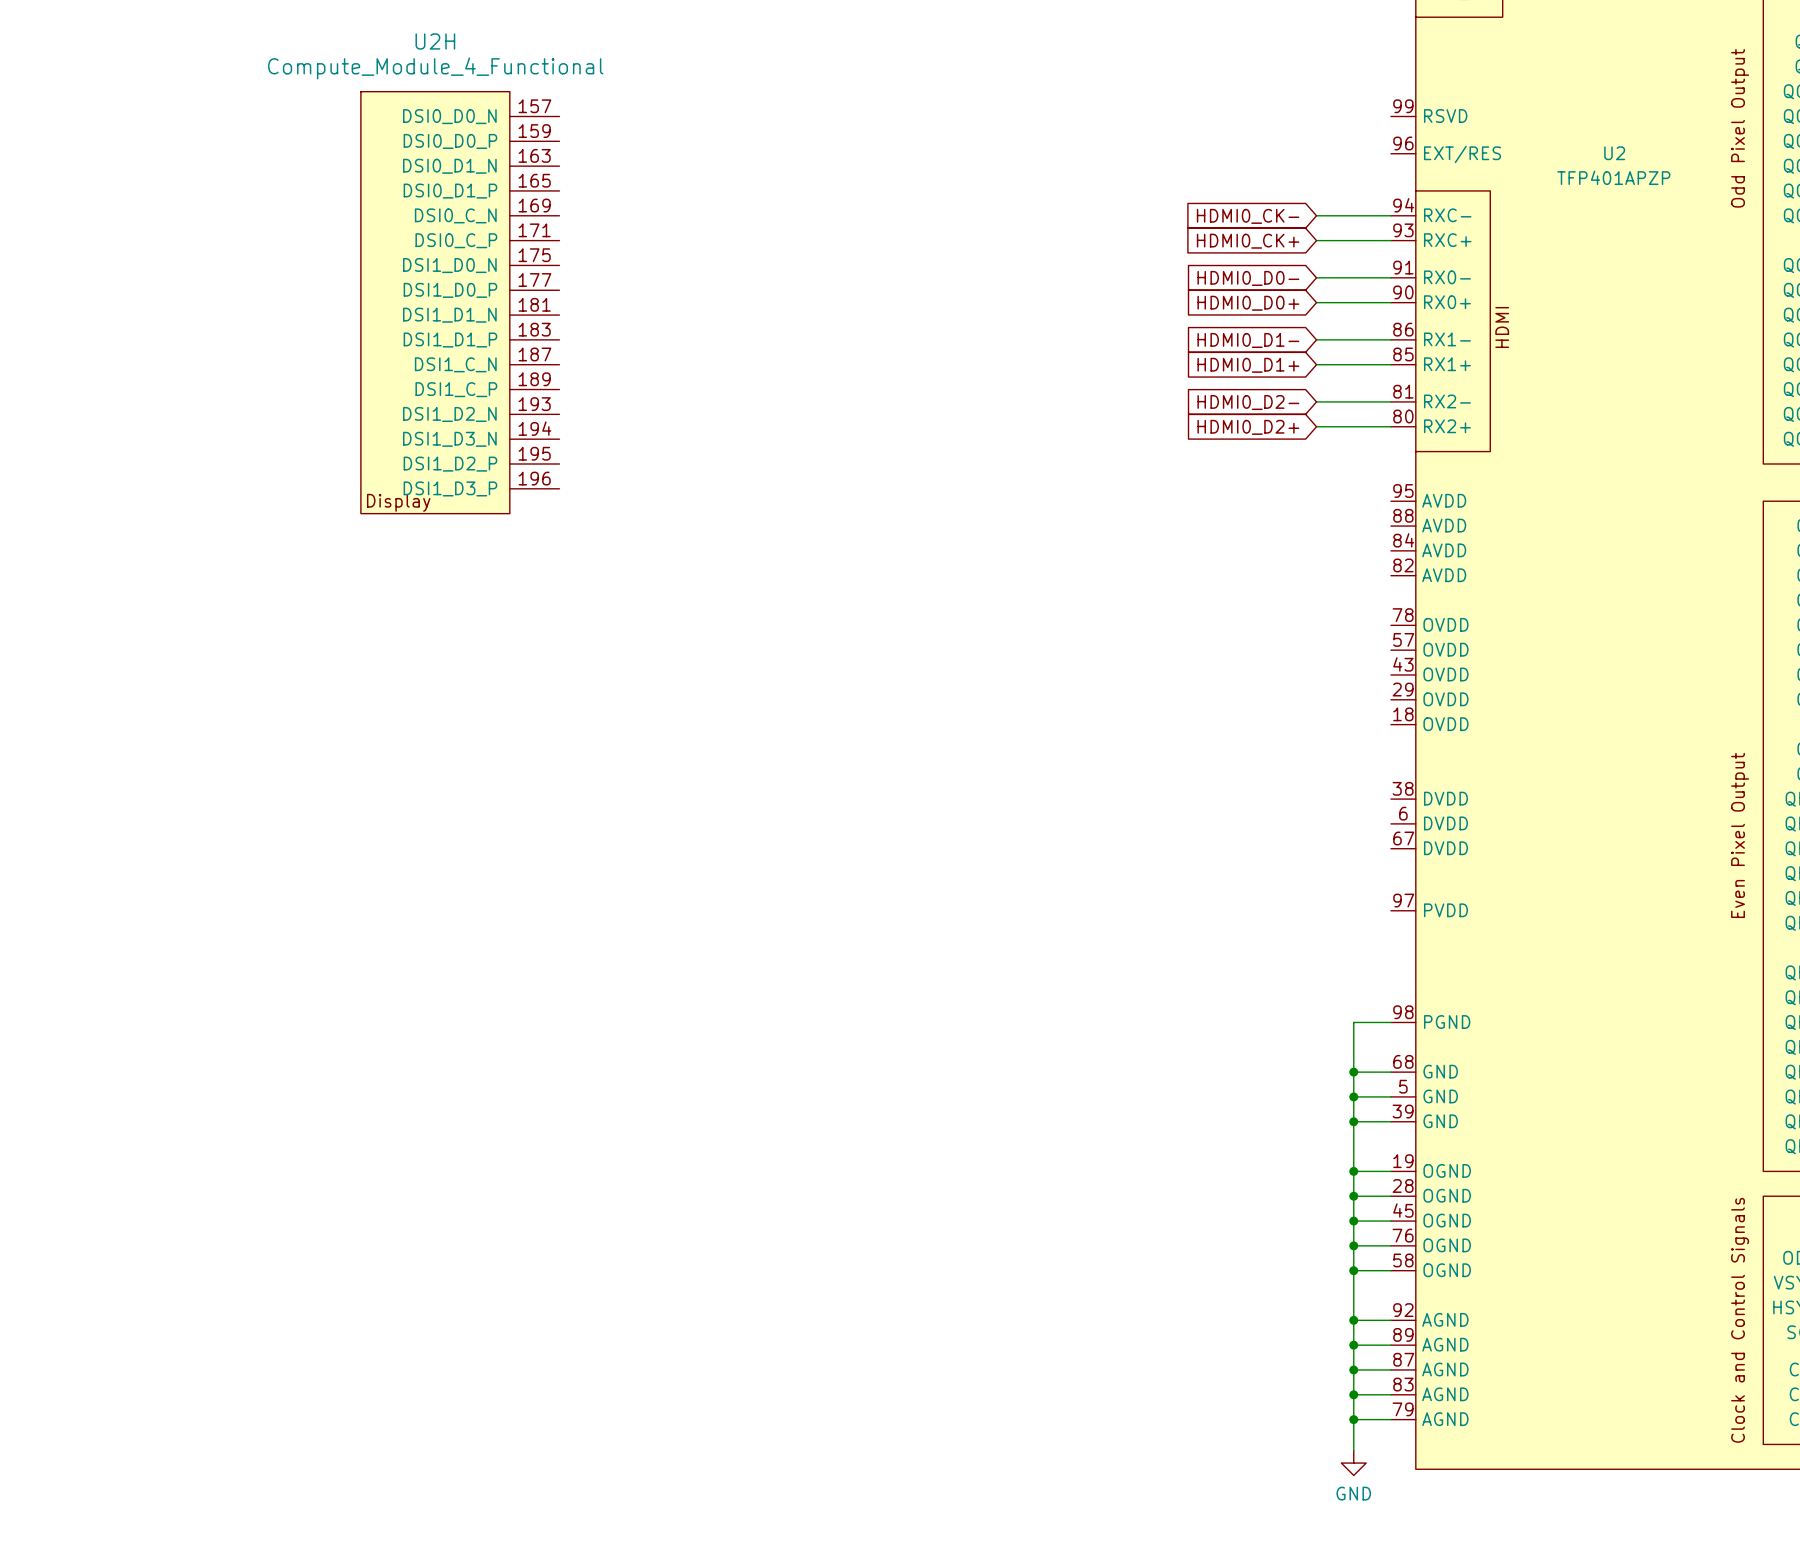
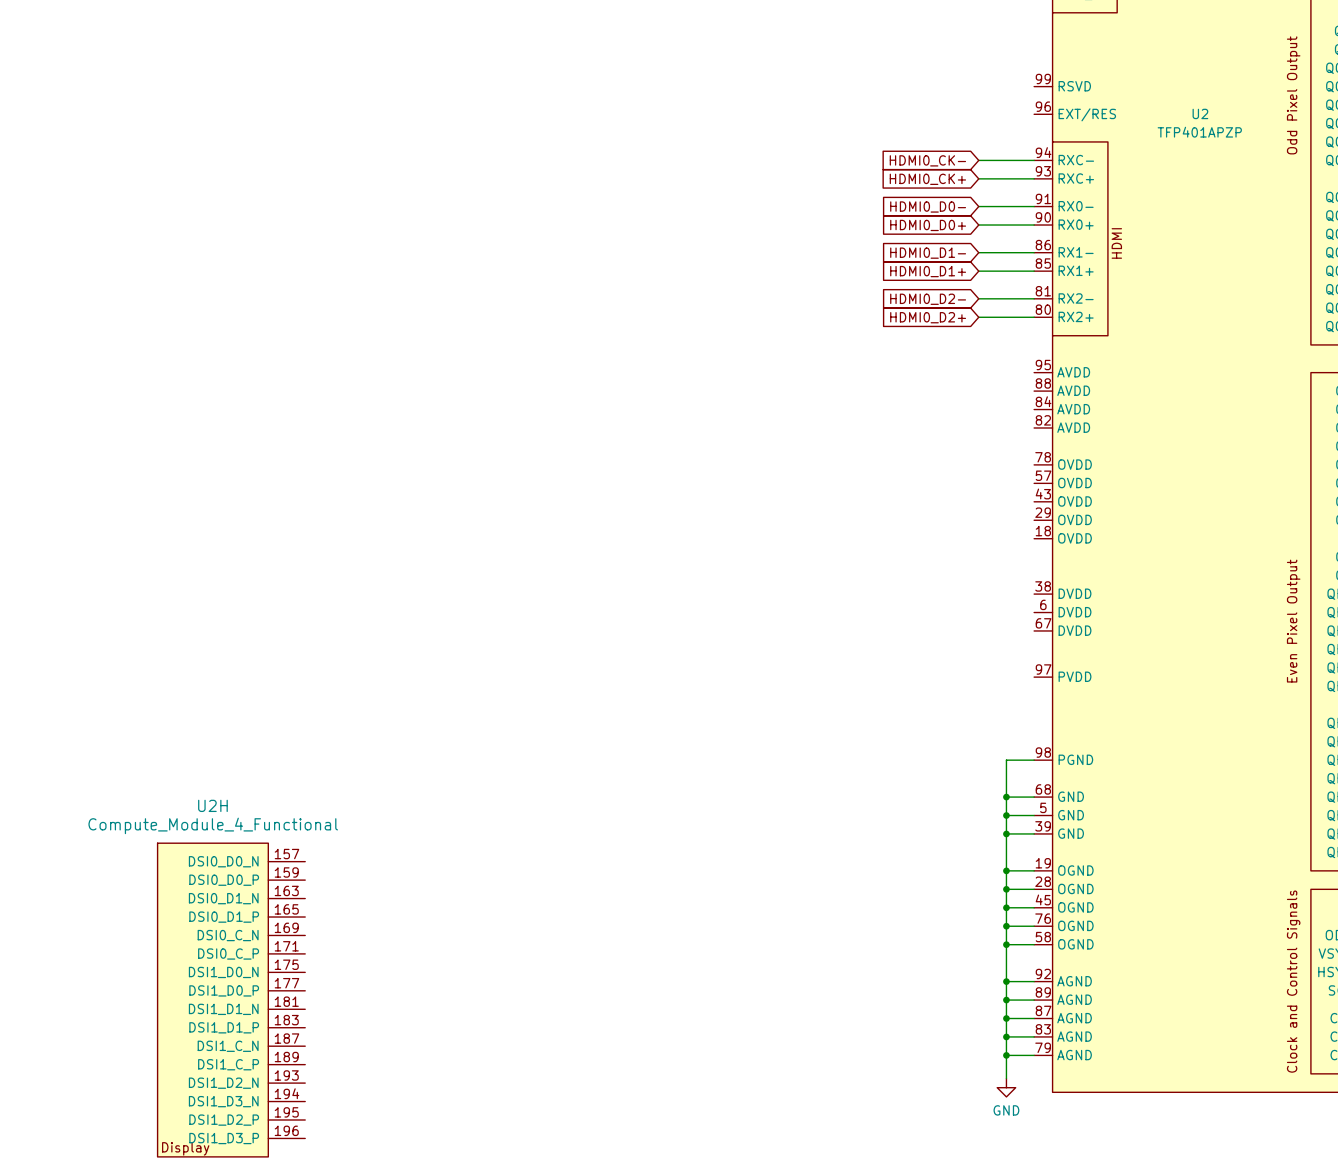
U2H position: (460, 302) -> (231, 1000)

